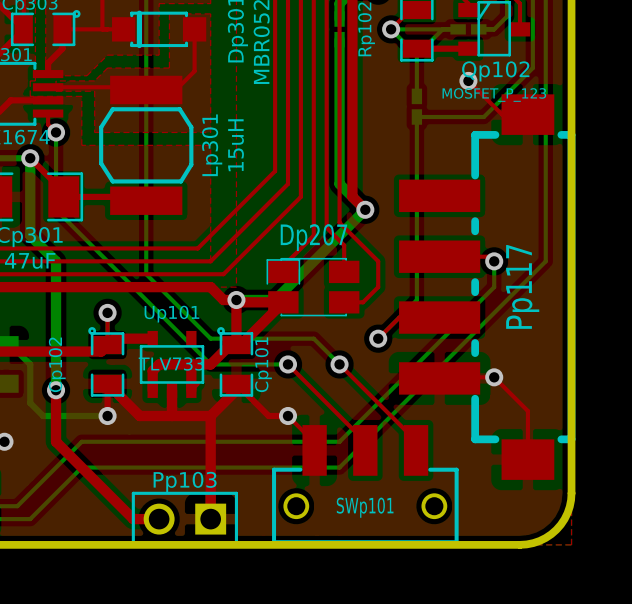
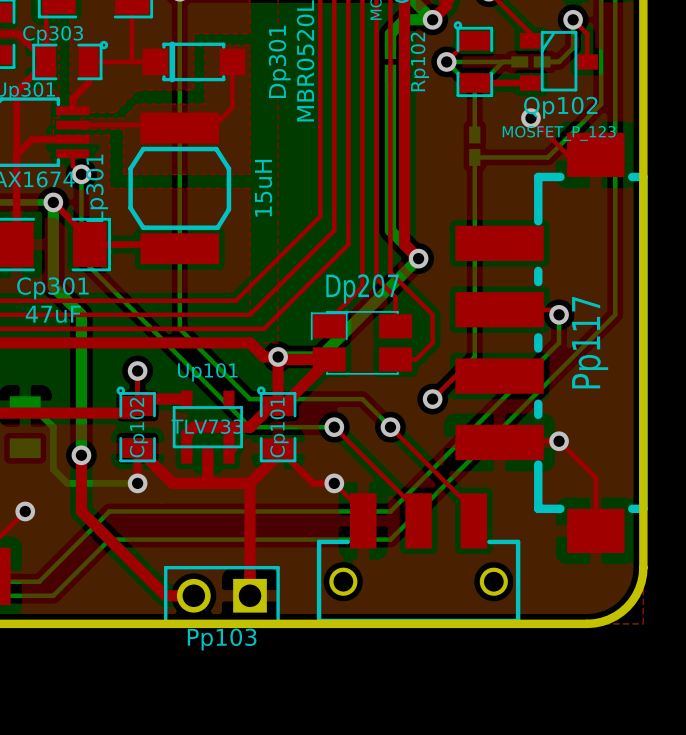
Lp301 name position: Lp301 (212, 145) -> Lp301 (97, 188)
Lp301 value position: 15uH (236, 145) -> 15uH (263, 188)
Cp102 name position: Cp102 (57, 364) -> Cp102 (138, 427)
Cp101 name position: Cp101 (263, 364) -> Cp101 (279, 427)
Pp103 name position: Pp103 (185, 481) -> Pp103 (222, 639)
SWp101 name: SWp101 (365, 507) -> none

